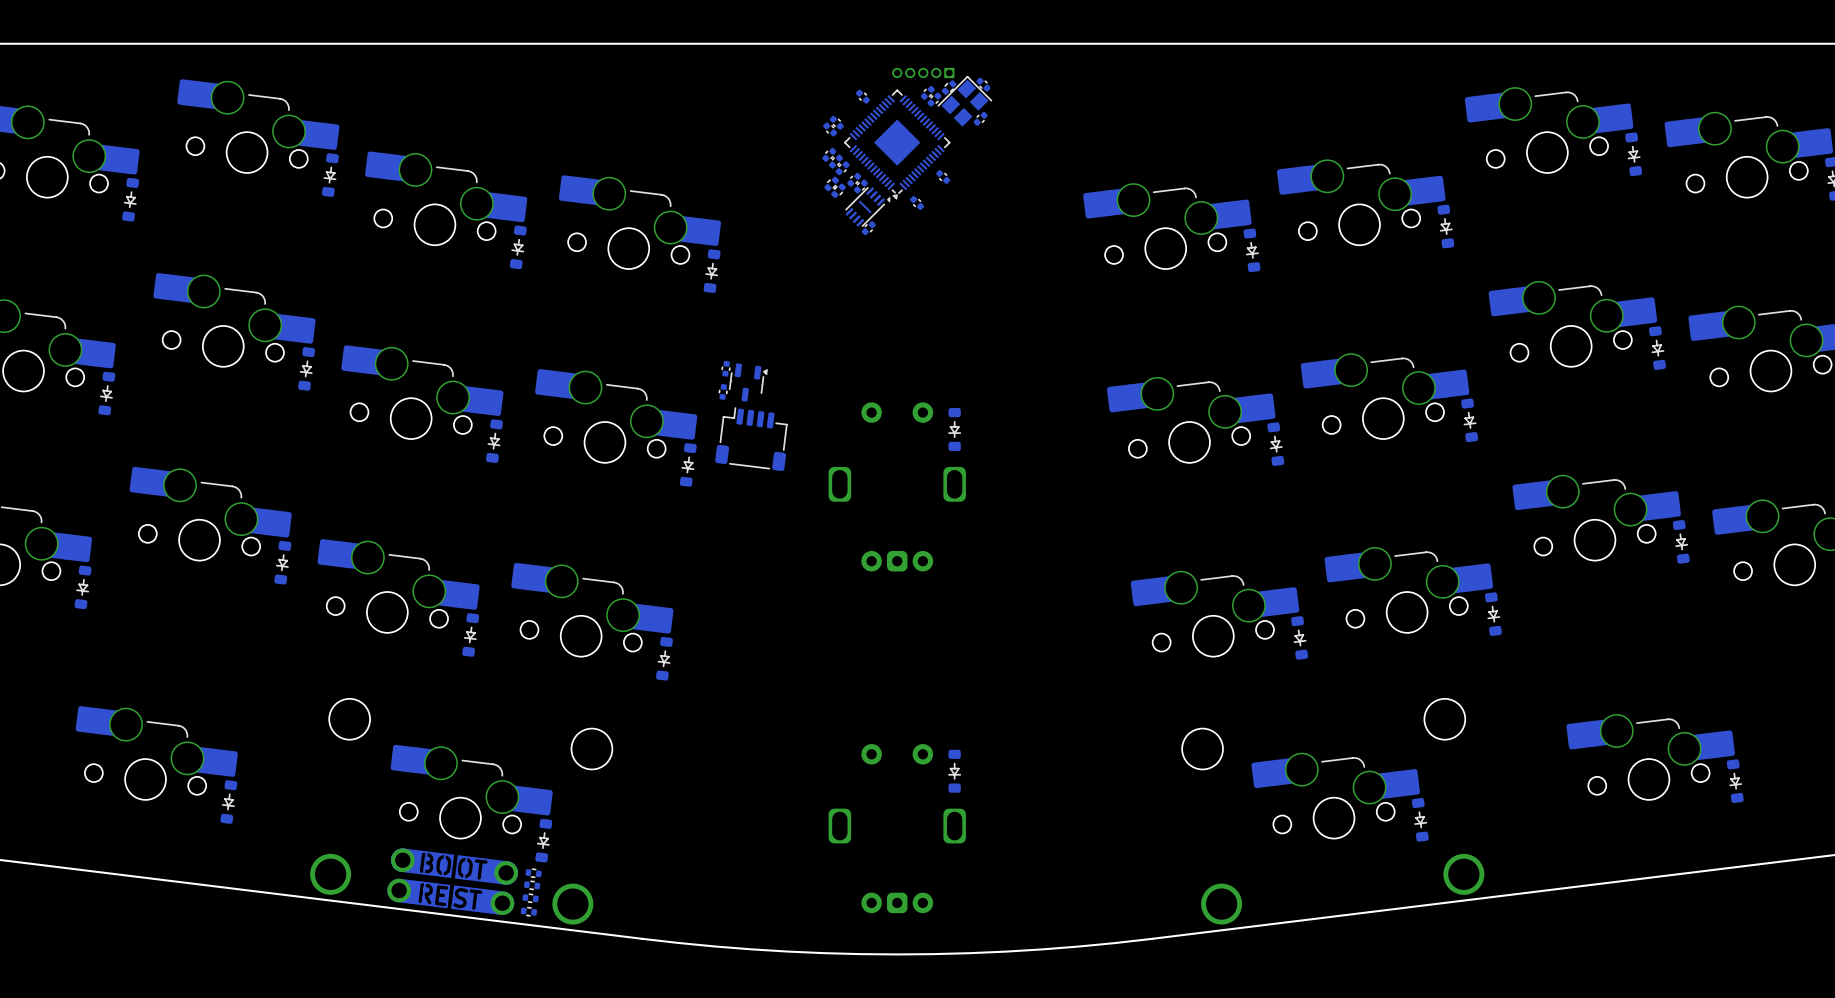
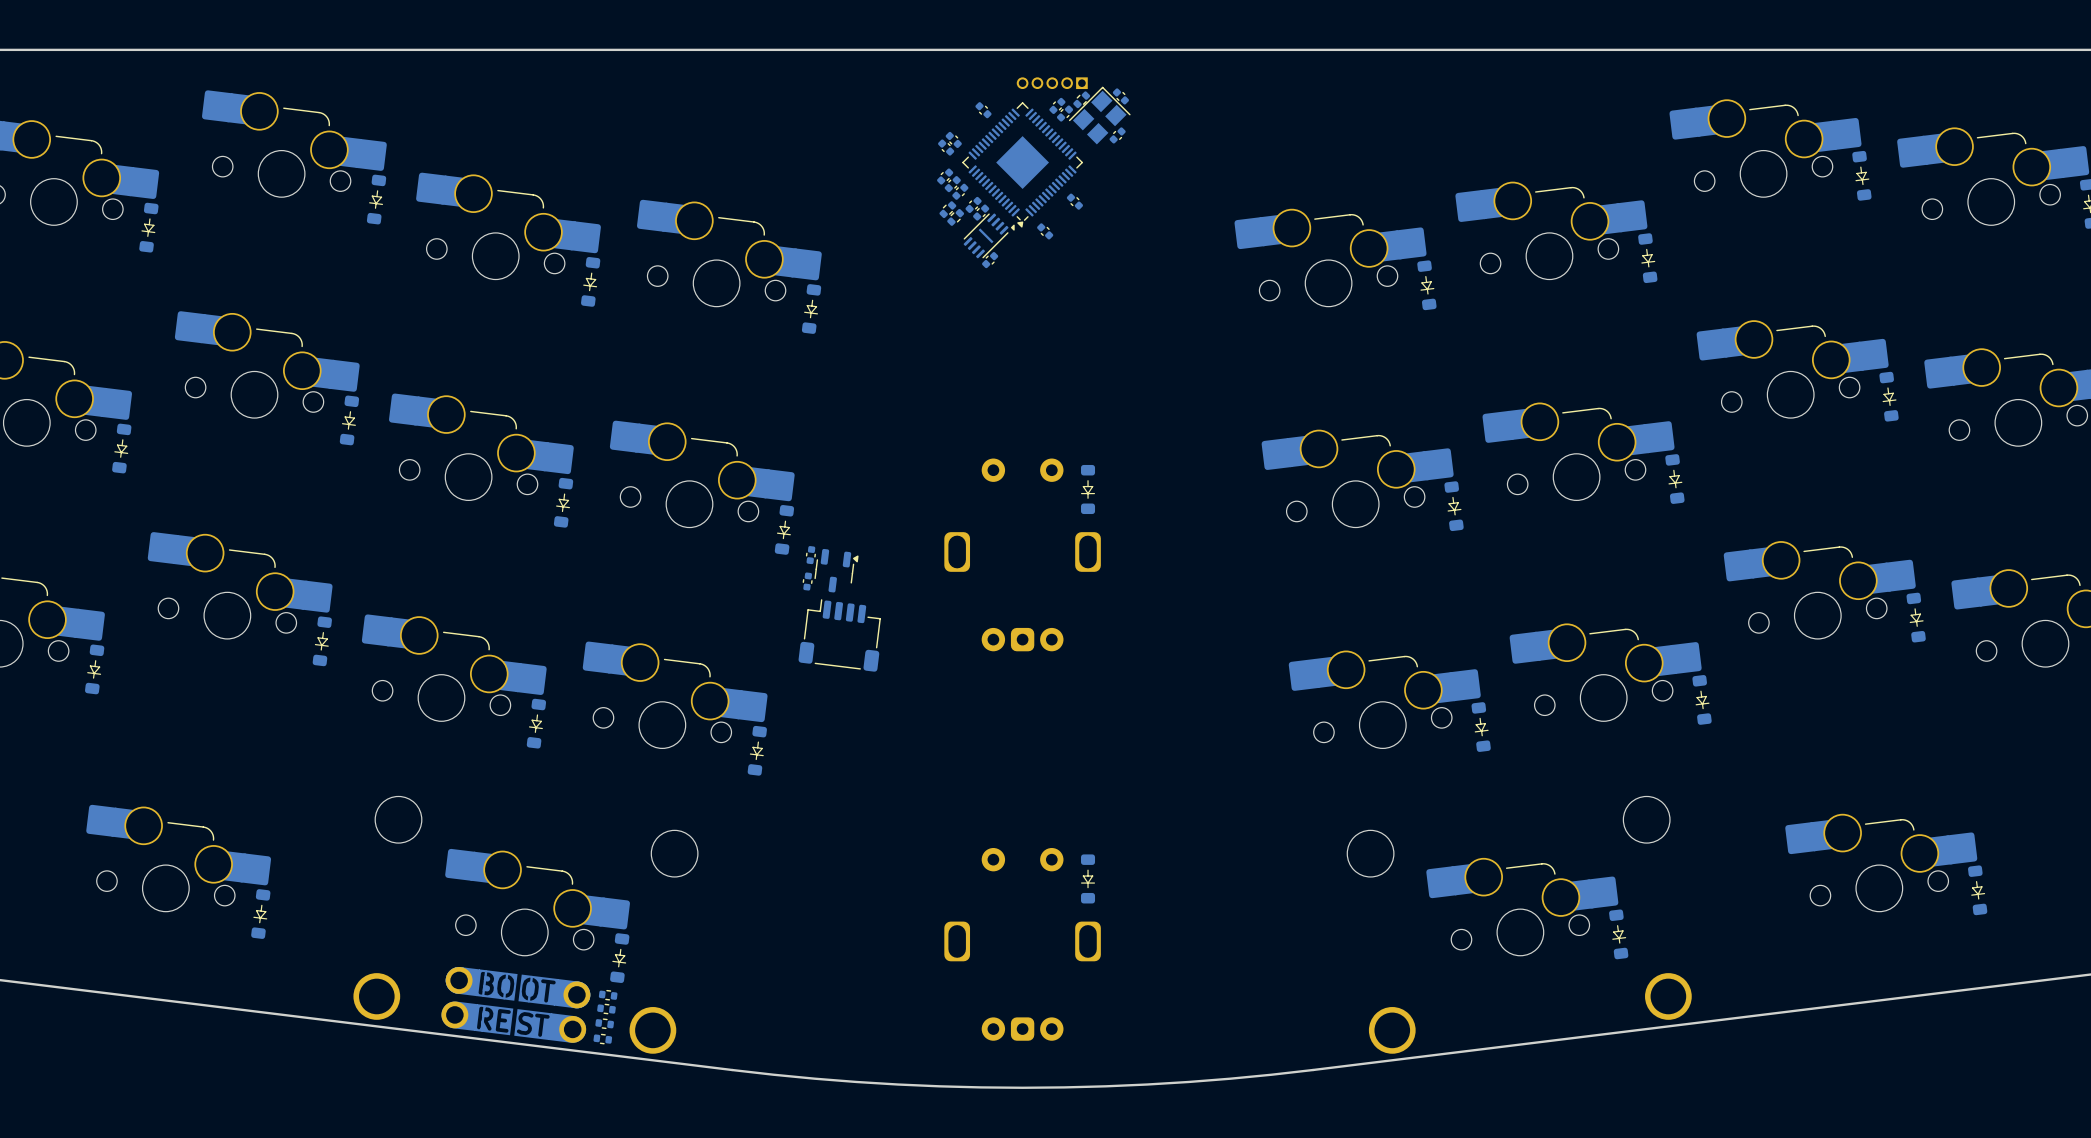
part: (726, 368) -> none
part position: (748, 382) -> (836, 570)
part: (723, 391) -> none
part position: (751, 439) -> (839, 635)
part: none -> (810, 555)
part: none -> (807, 581)

